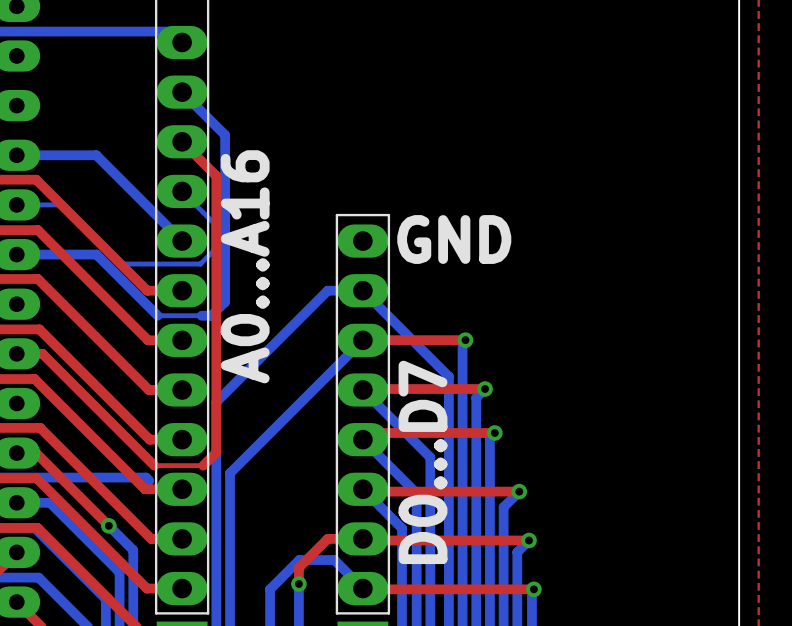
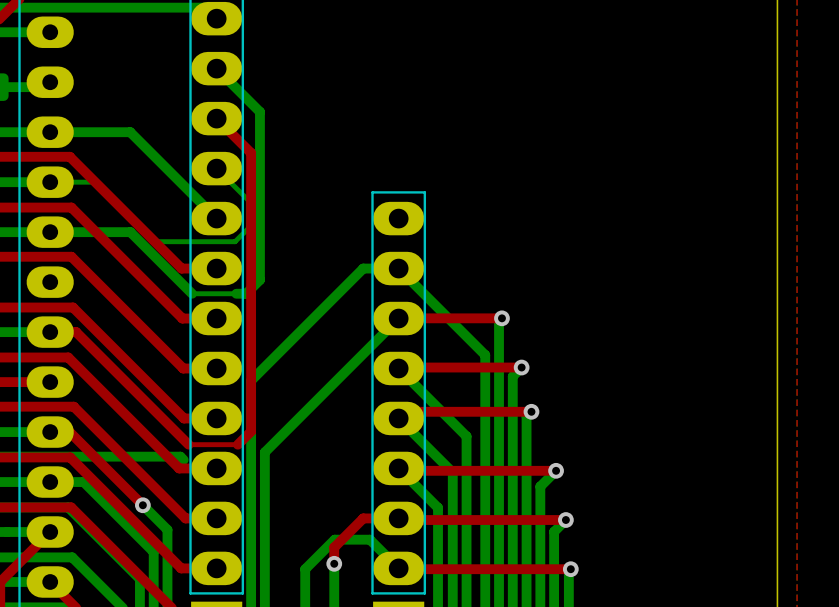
text: GND (454, 239) -> none
text: A0...A16 (245, 266) -> none
text: D0...D7 (423, 462) -> none

